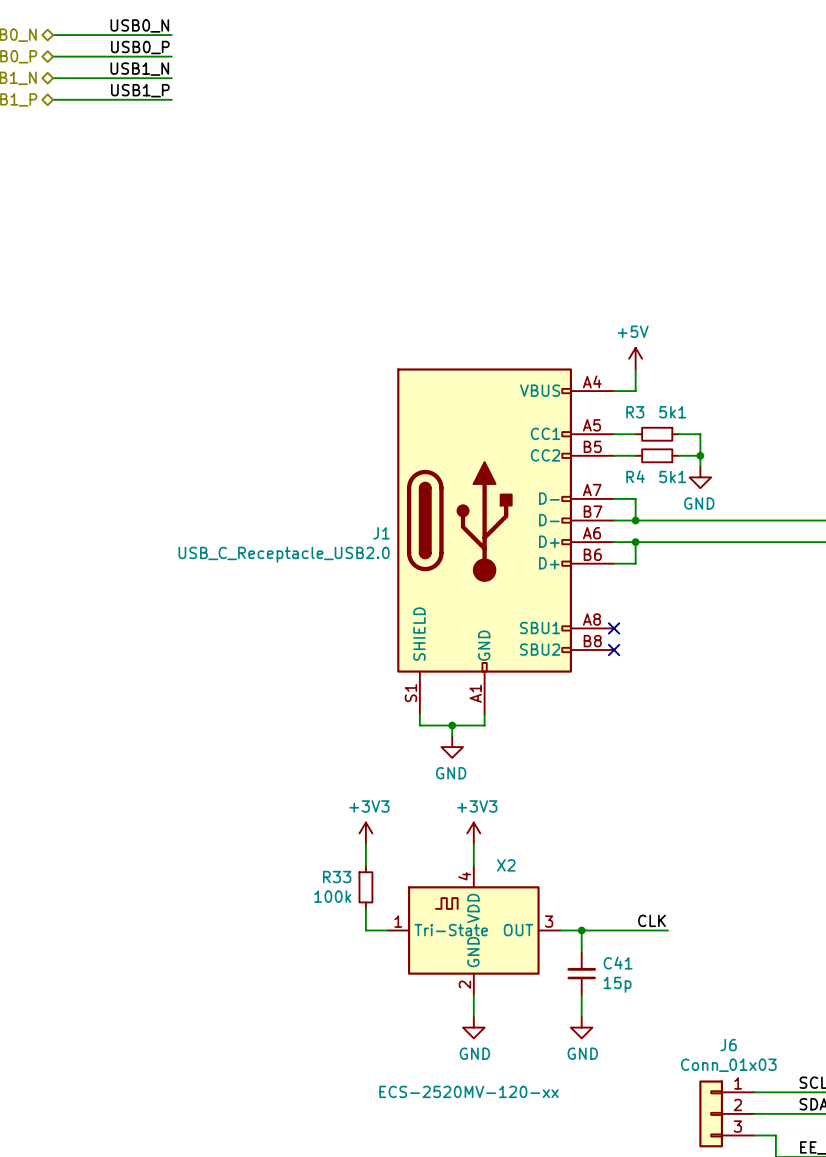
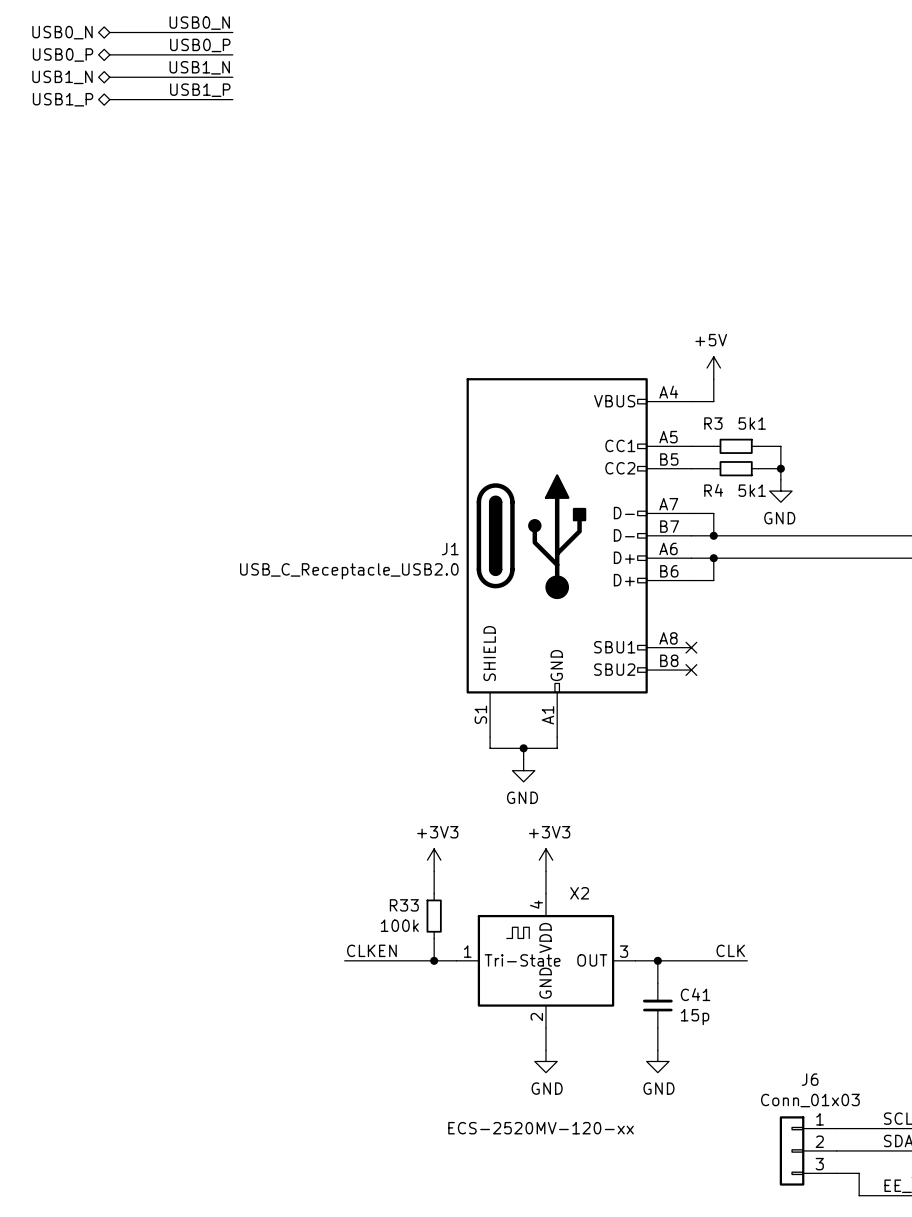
label: none -> CLKEN (371, 950)
wire: none -> (344, 960) (434, 960)
junction: none -> (434, 960)

